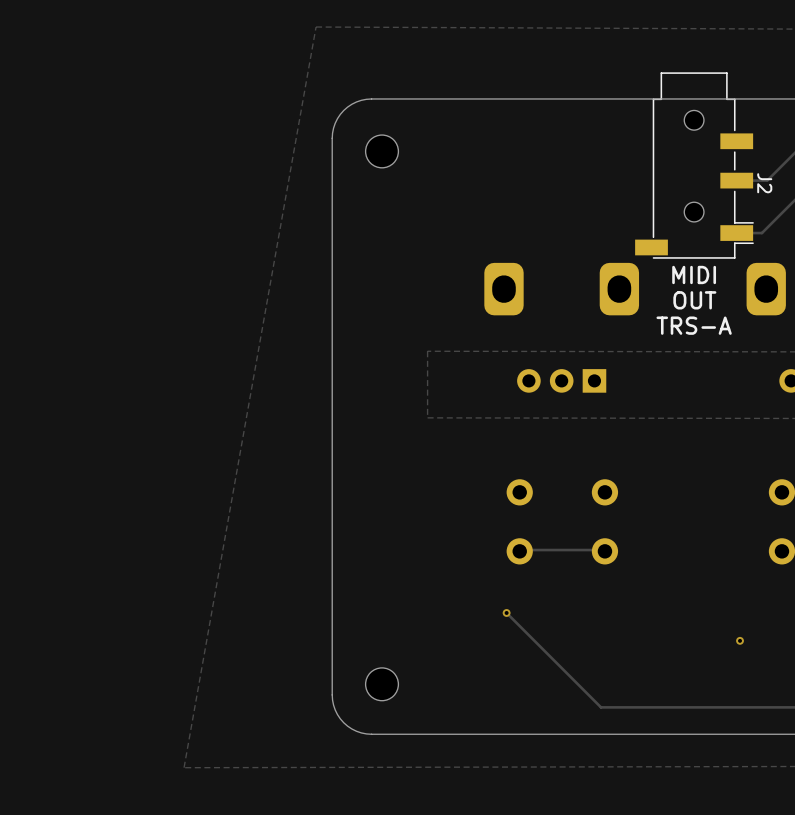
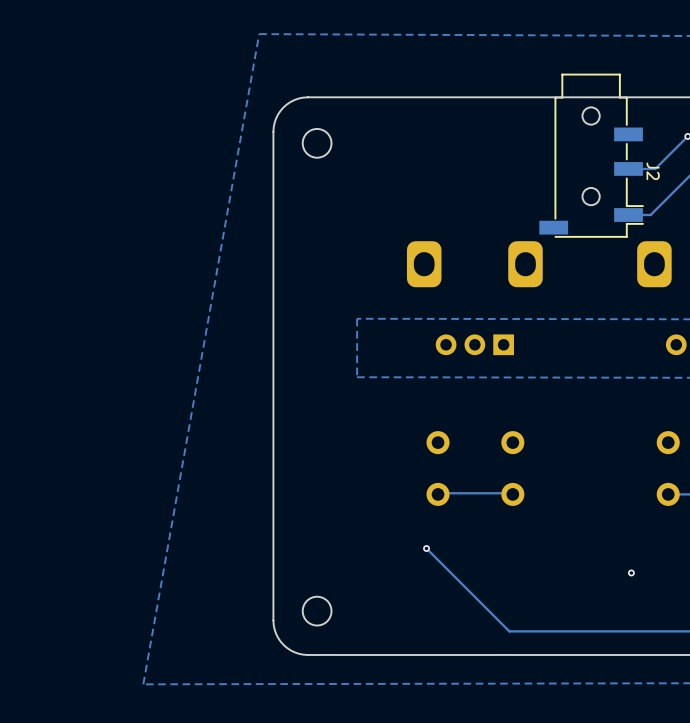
text: MIDI (694, 274) -> none
text: OUT (694, 300) -> none
text: TRS-A (694, 325) -> none

